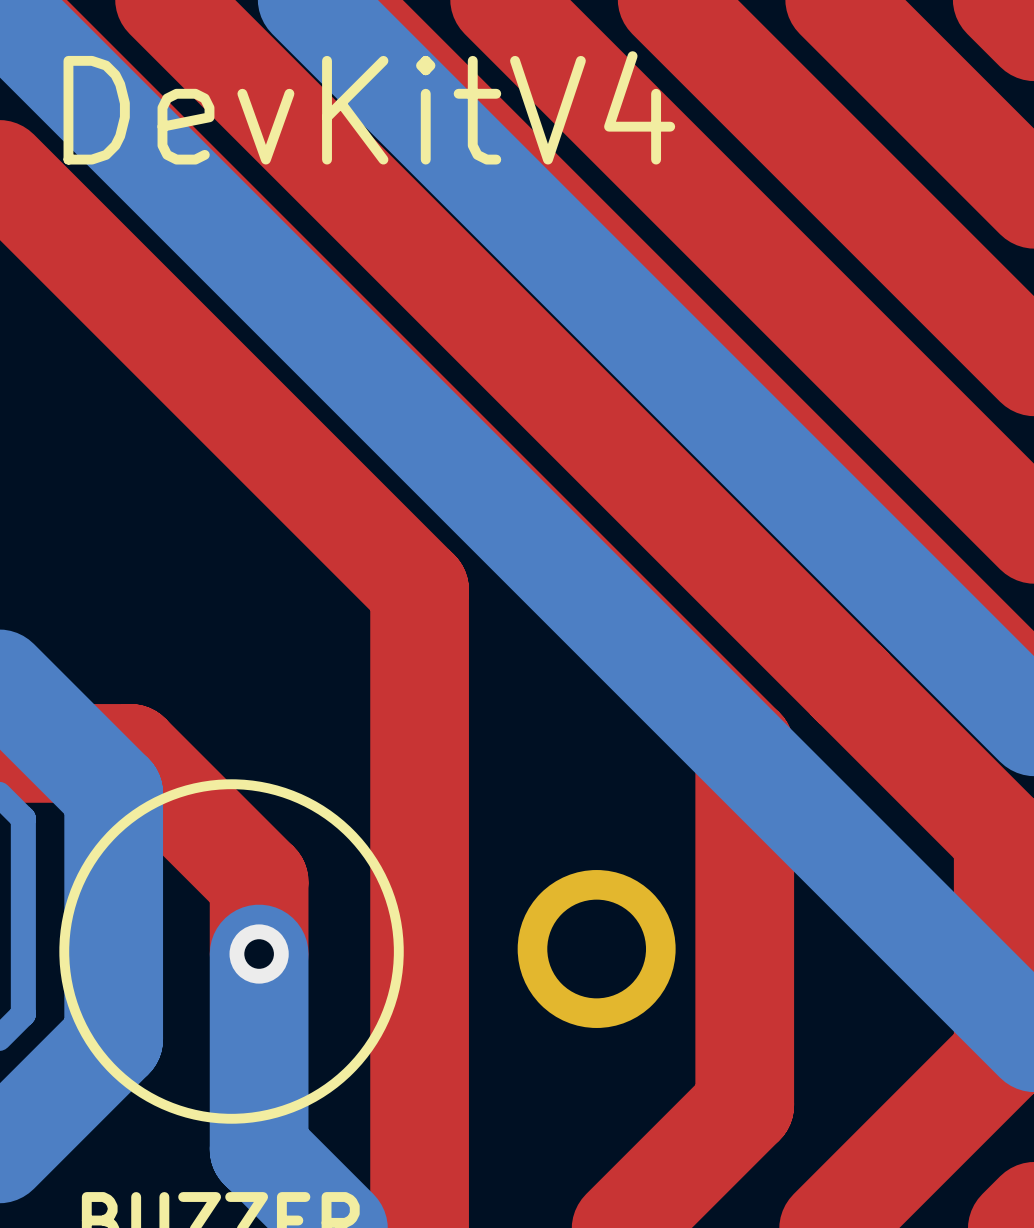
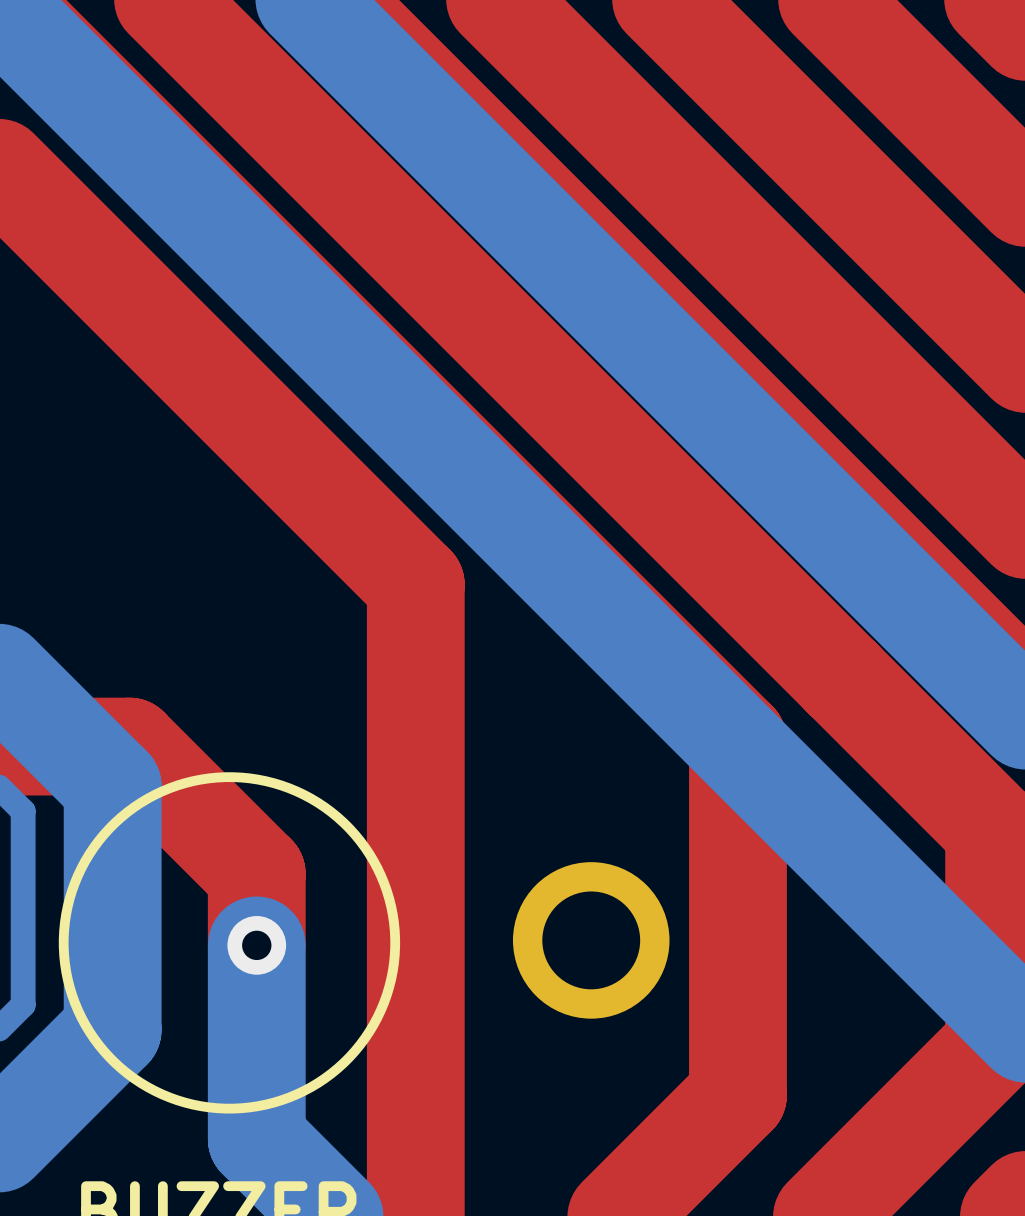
text: DevKitV4 (369, 107) -> none

